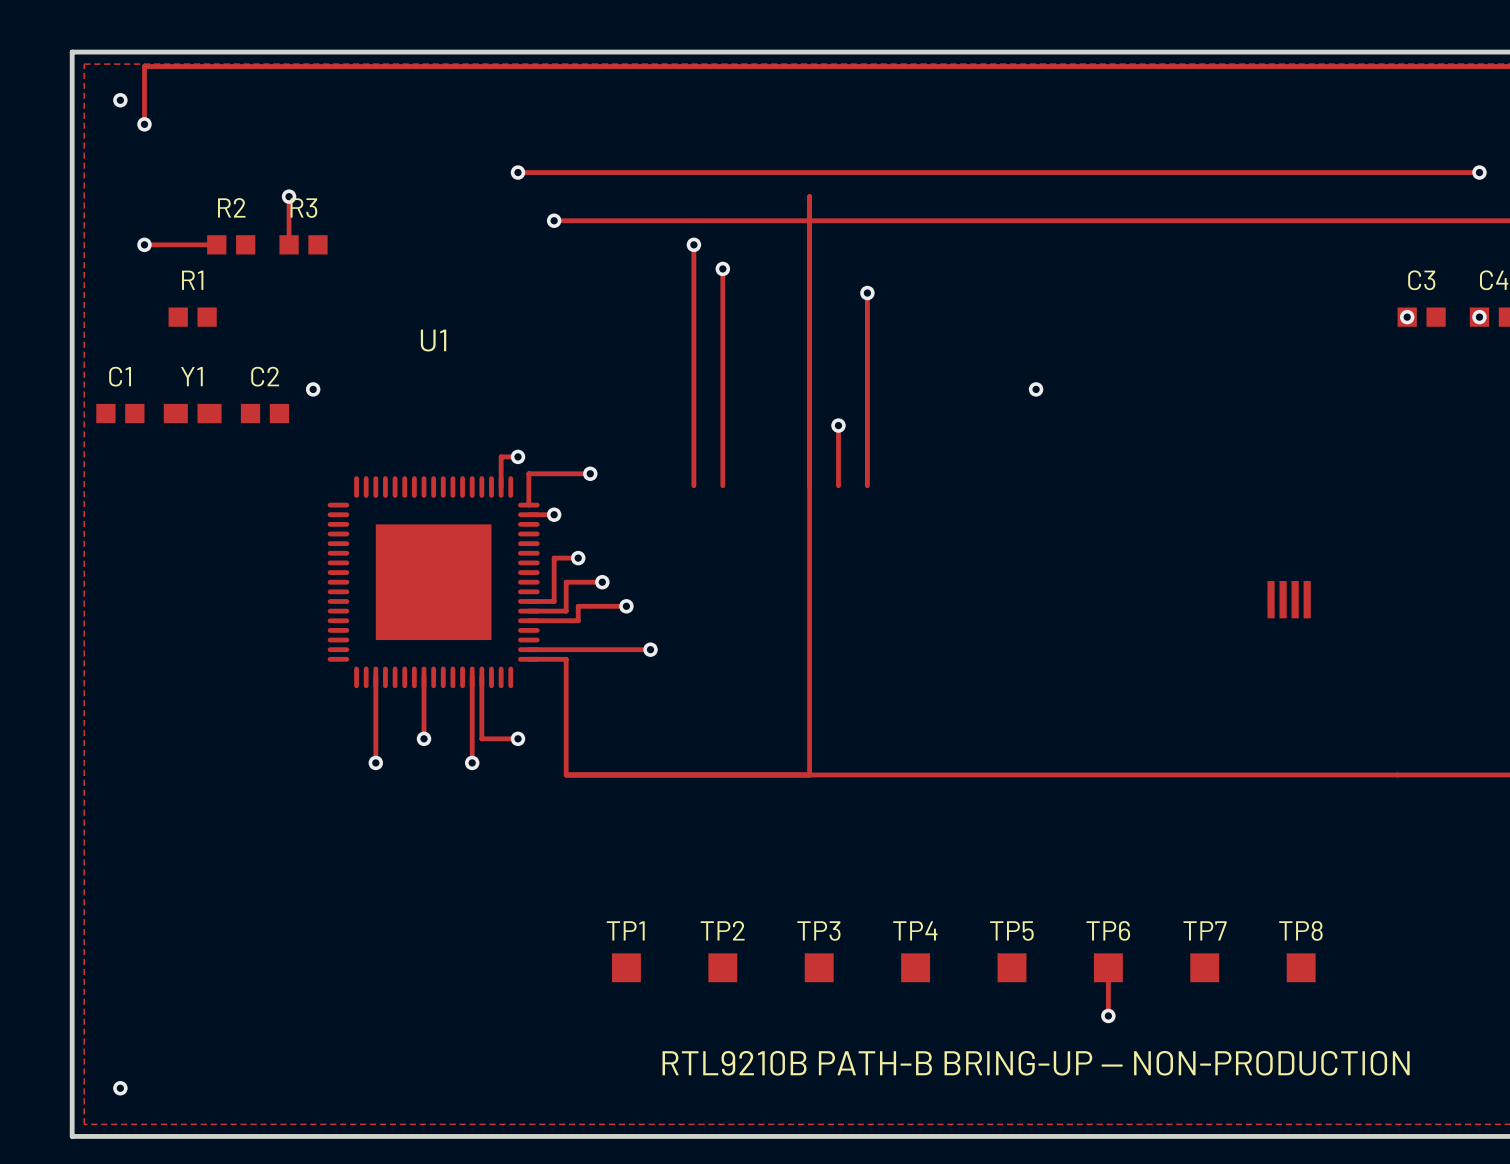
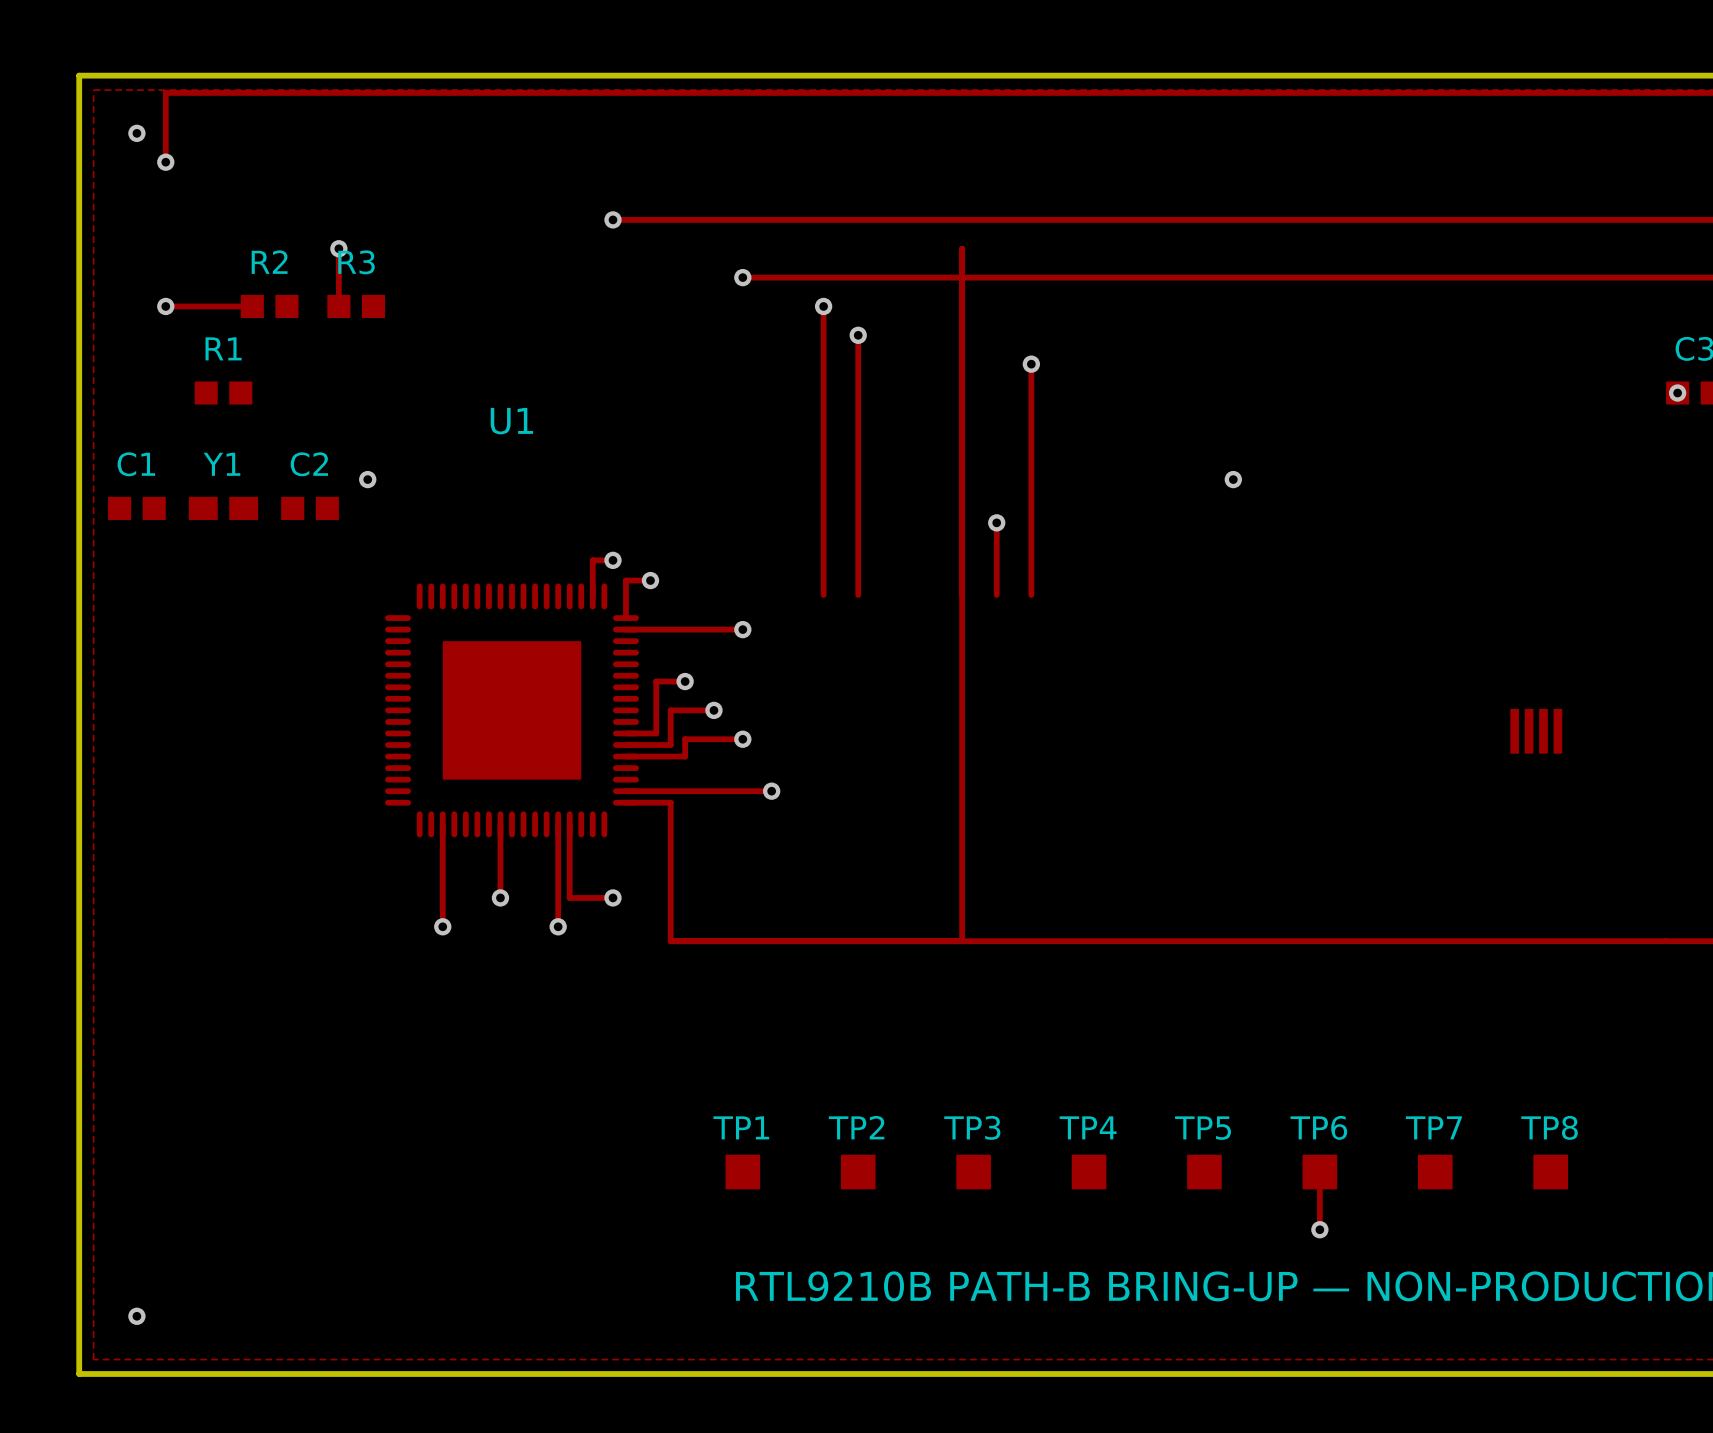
track: (554, 220) (626, 220) -> (656, 629) (742, 629)
via position: (554, 220) -> (742, 277)
track: (549, 473) (590, 473) -> none
via: none -> (650, 580)
via: (590, 473) -> none
via: (554, 514) -> none
via: none -> (742, 629)

